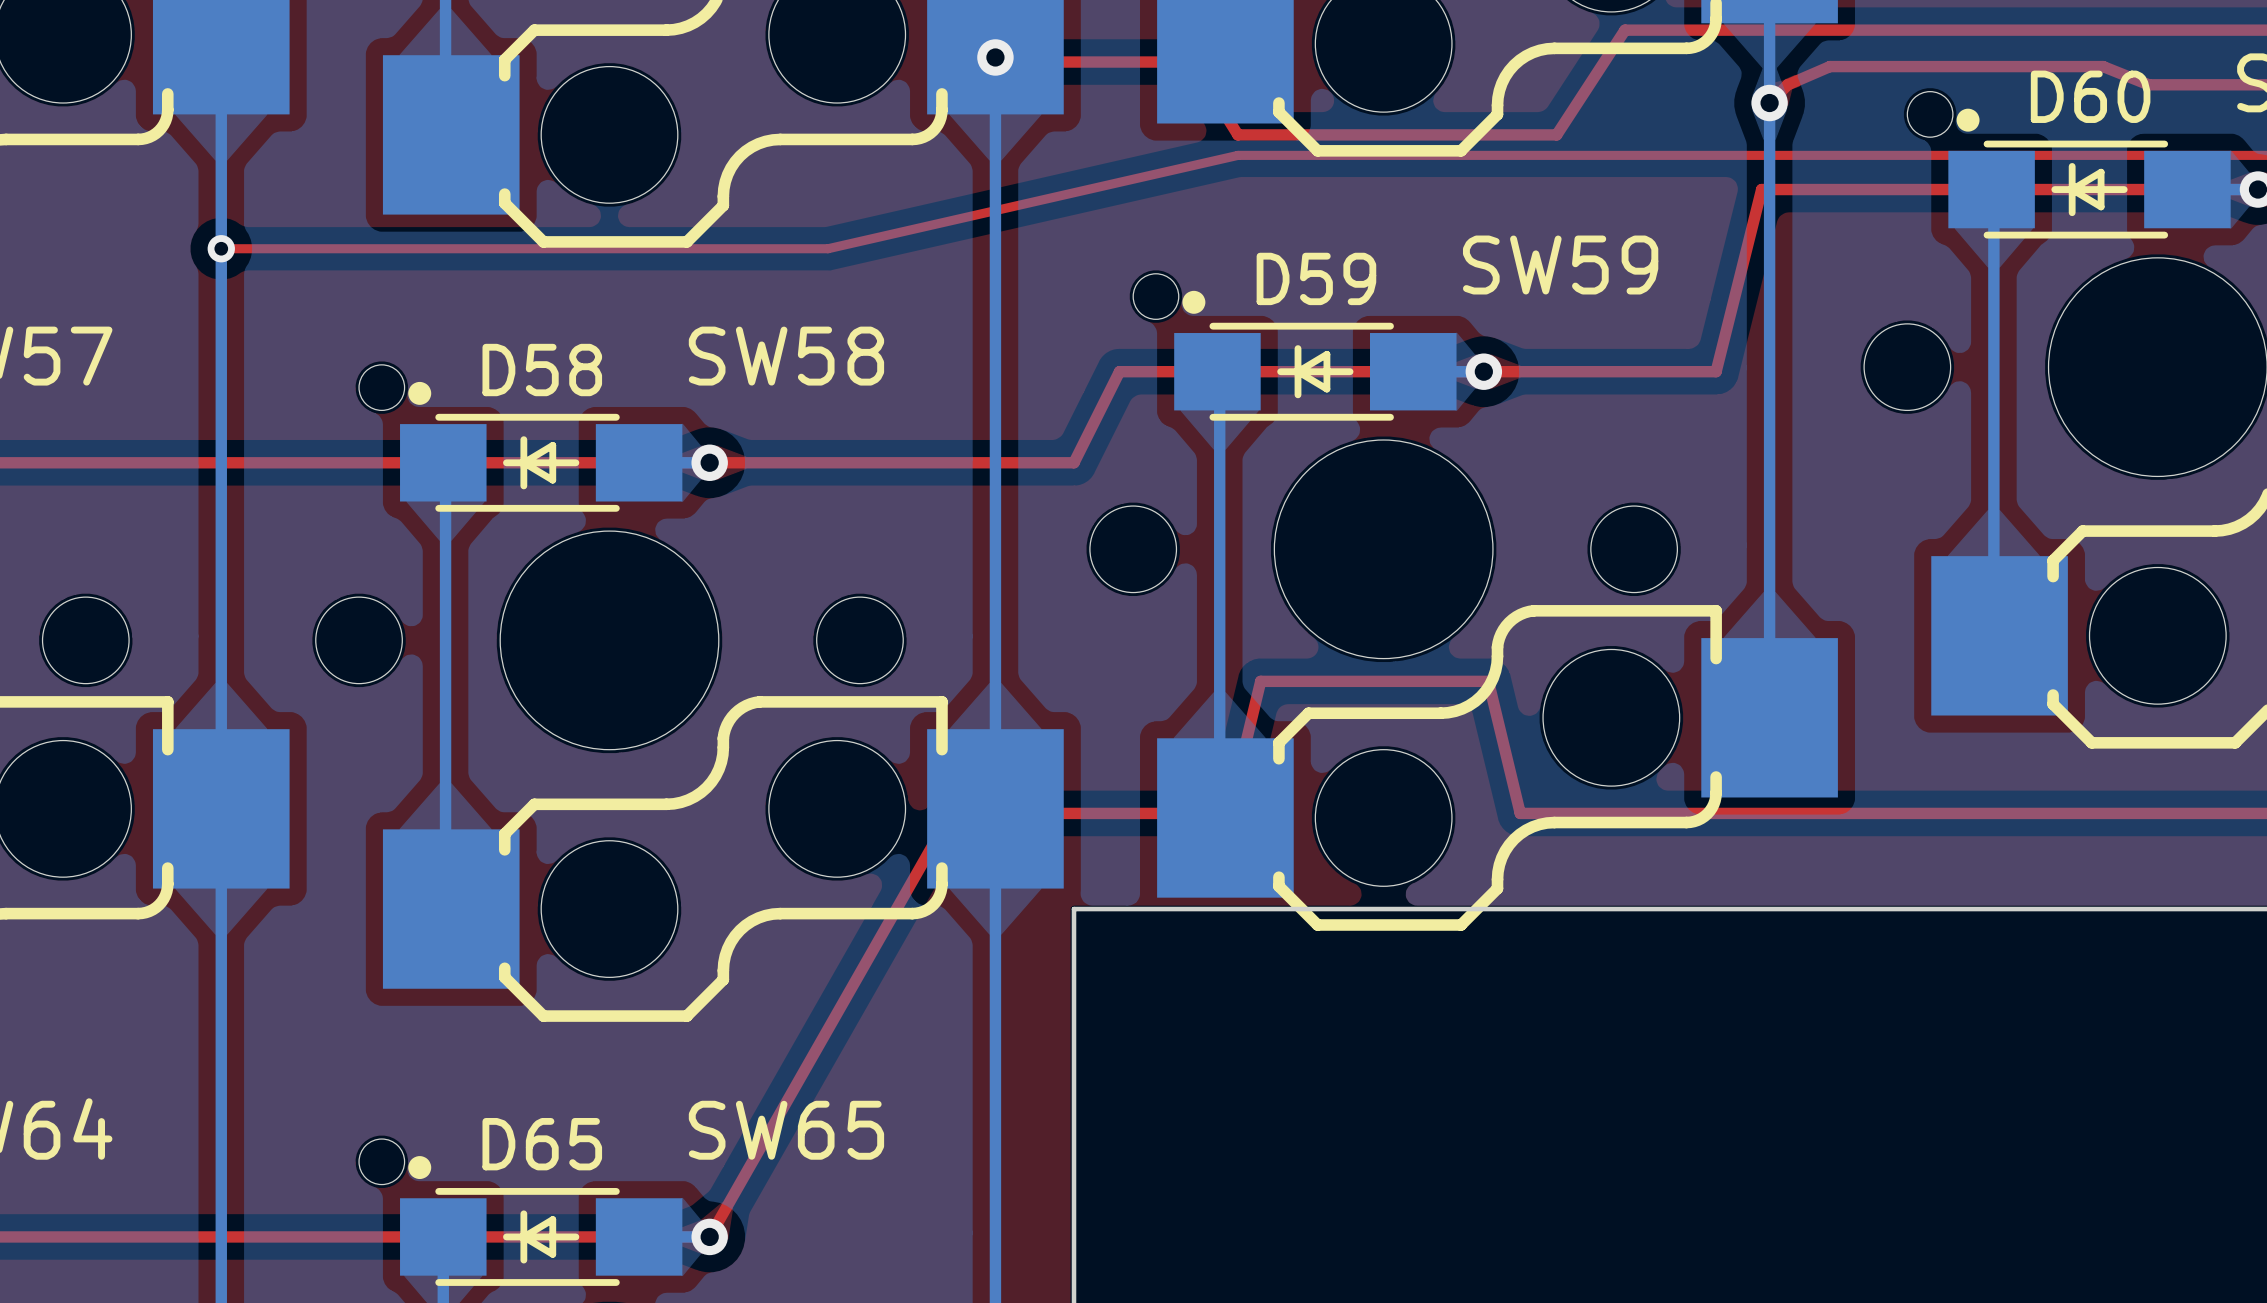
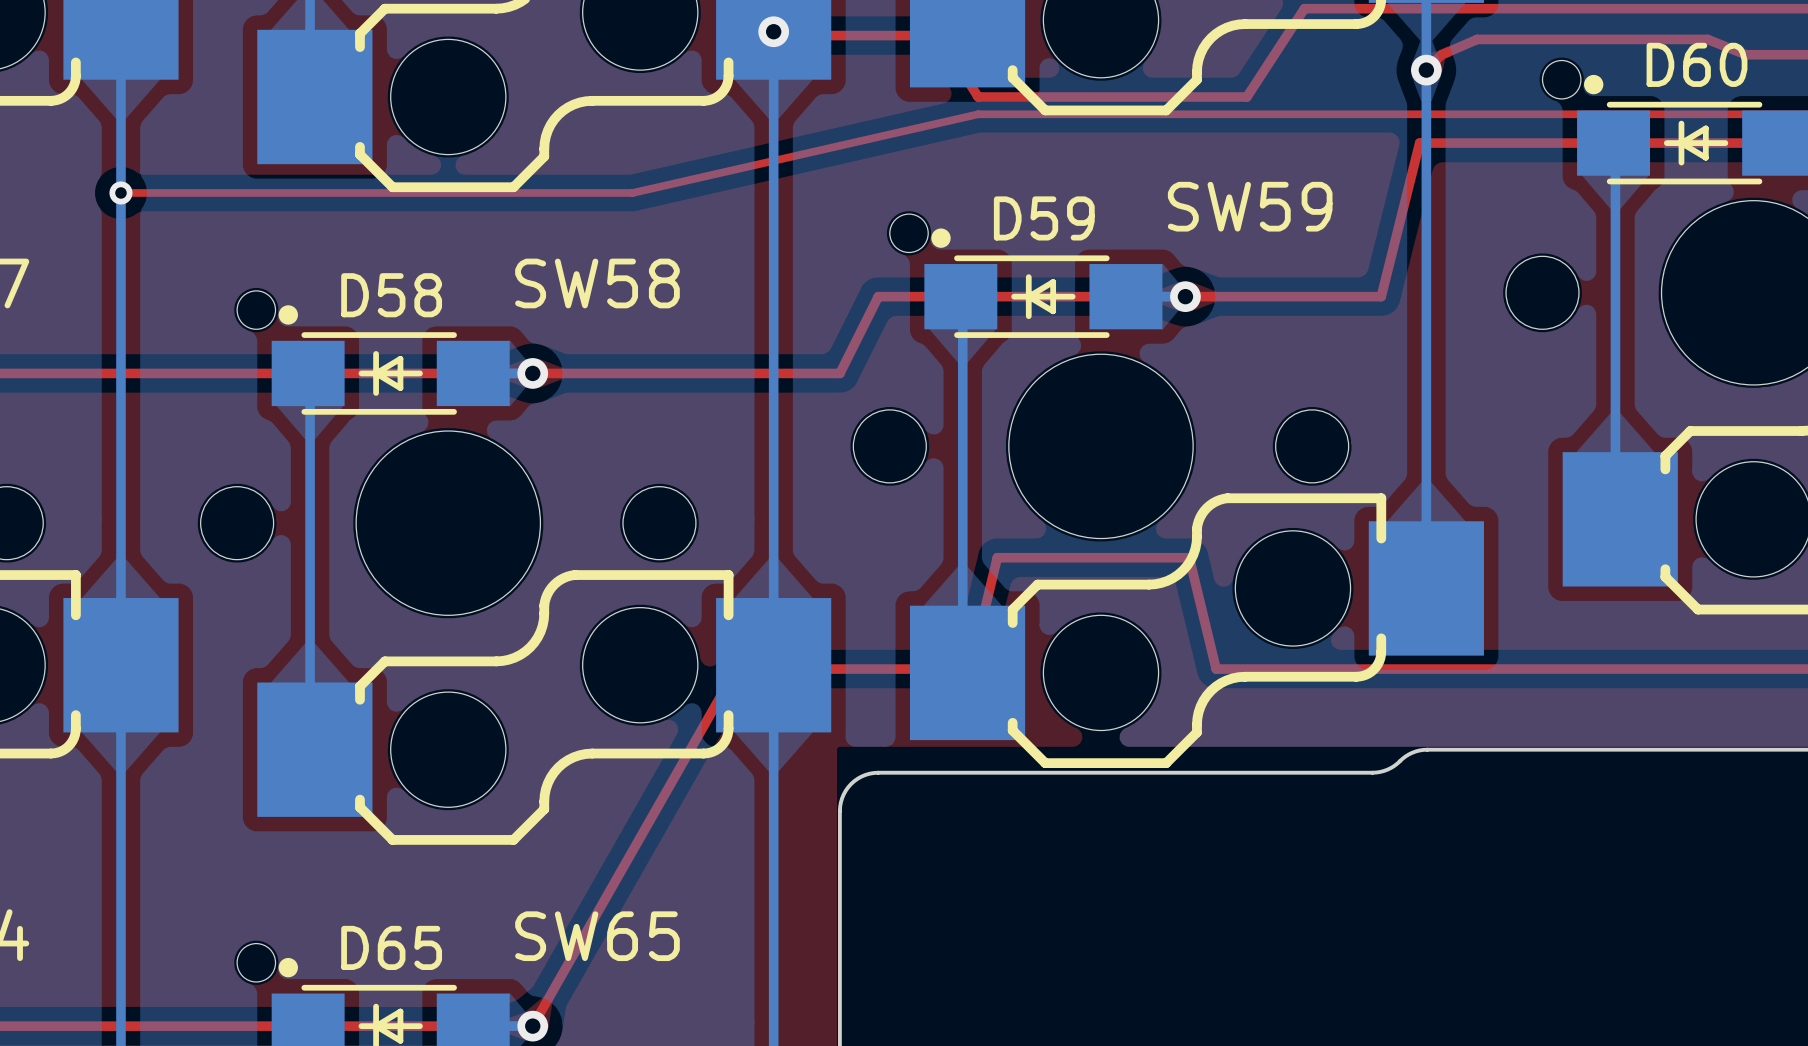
board edge: (1770, 909) (1073, 909) (1073, 981) -> (1427, 749) (1412, 752) (1390, 768) (1372, 772) (874, 772) (861, 776) (851, 783) (842, 798) (839, 811)

